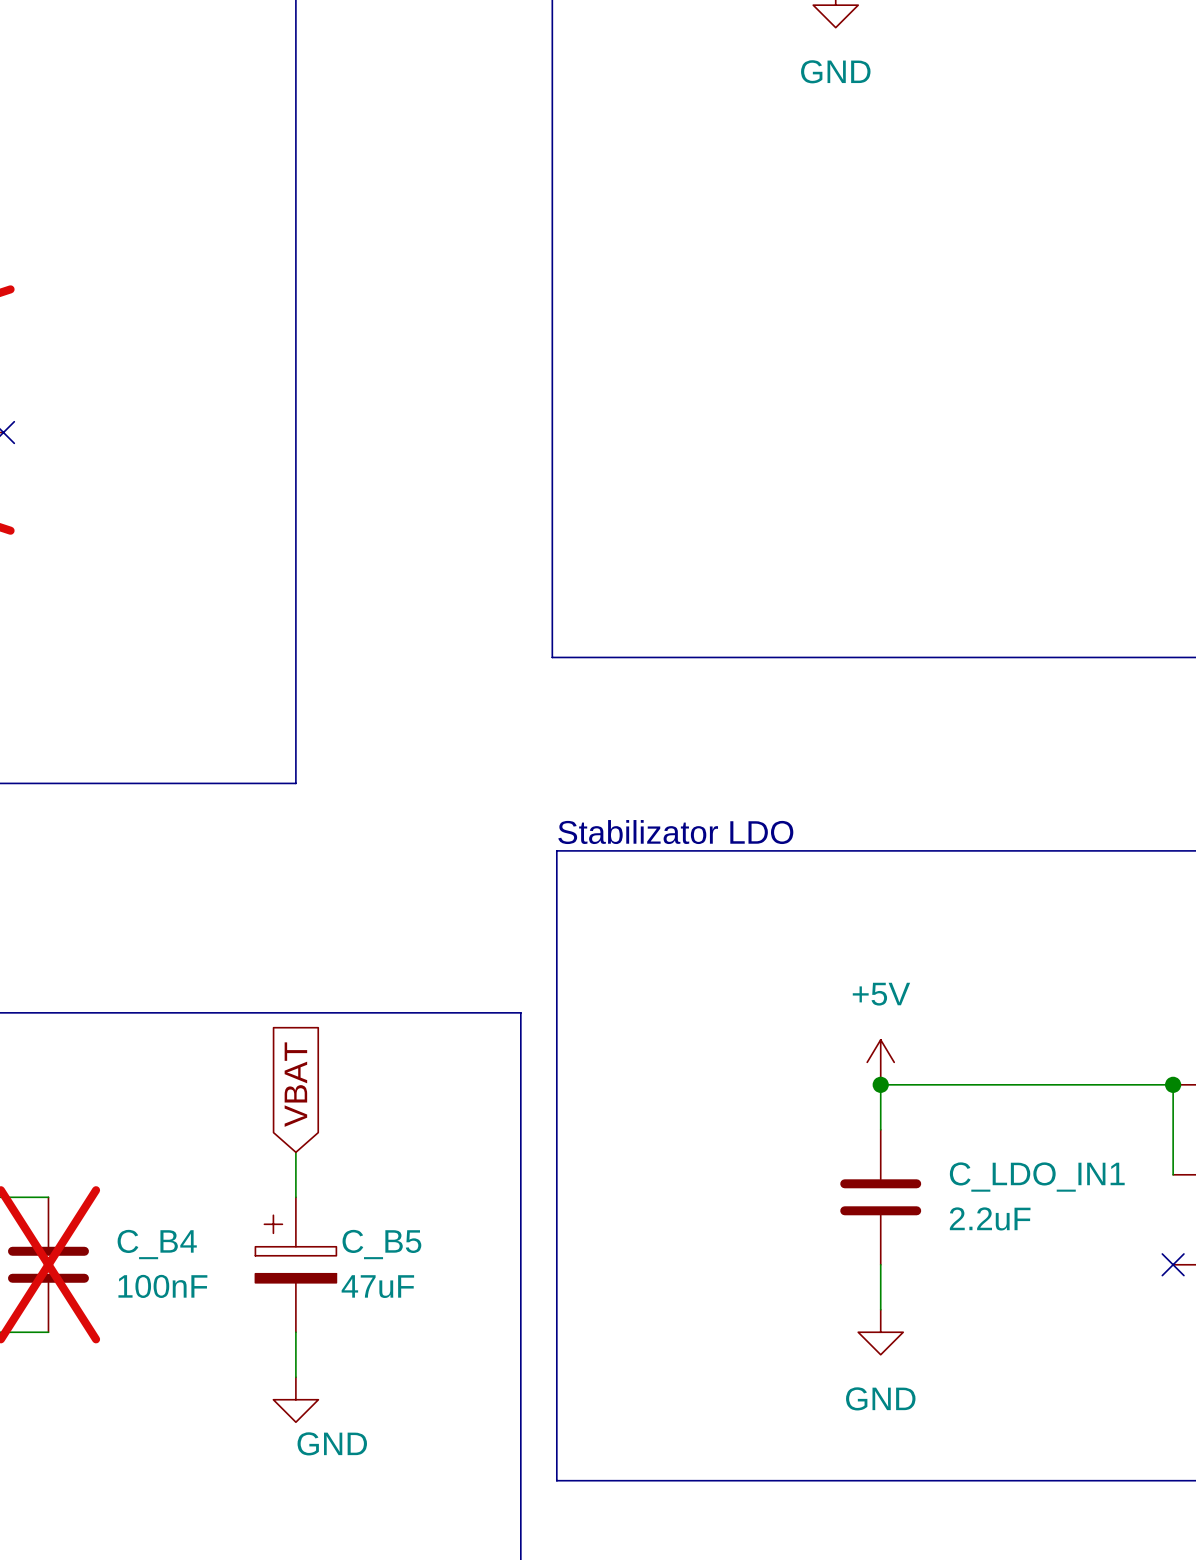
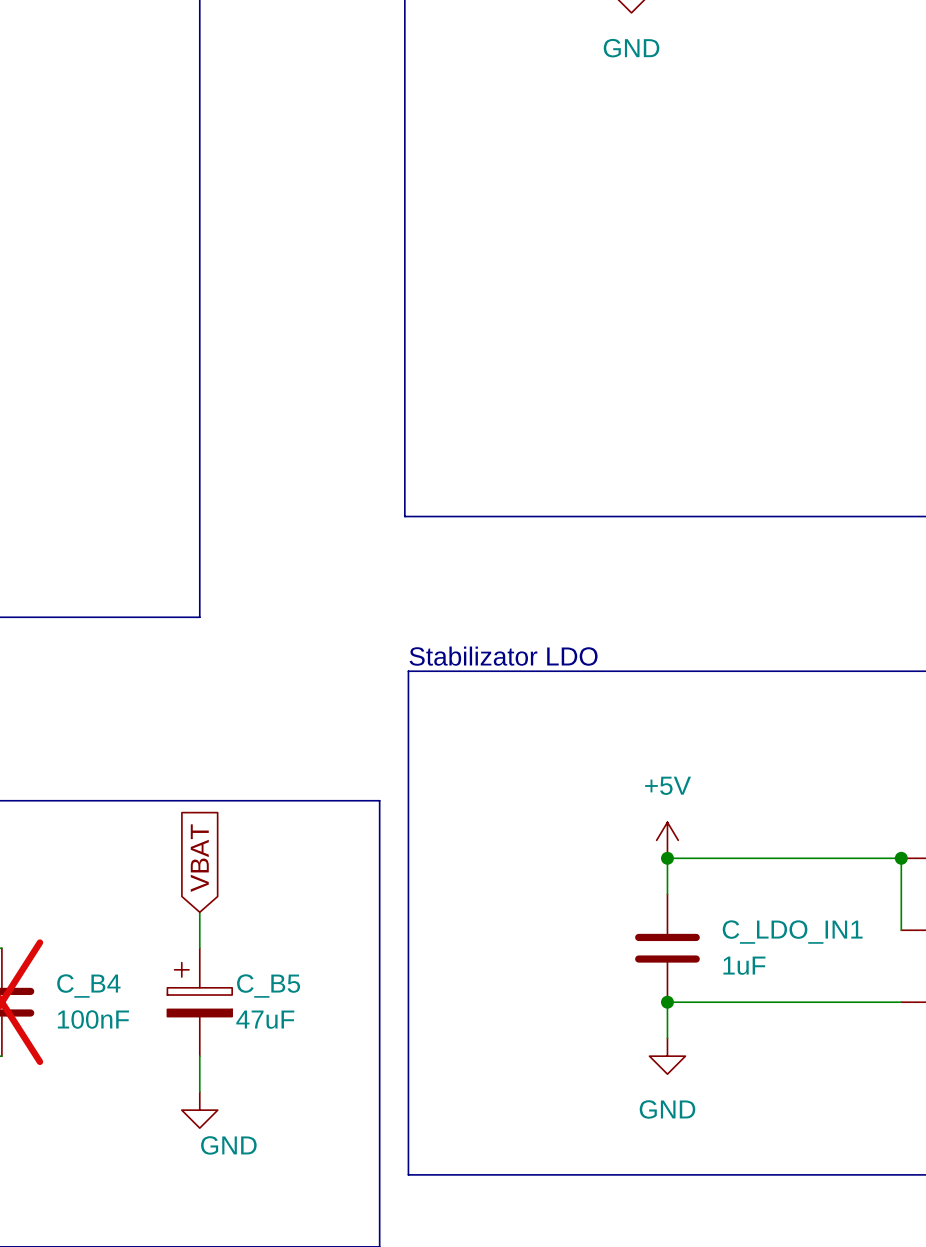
C_LDO_IN1 value: 2.2uF (990, 1218) -> 1uF (744, 965)
wire: none -> (667, 1002) (901, 1002)
junction: none -> (667, 1002)
no-connect mark: (1173, 1264) -> none

